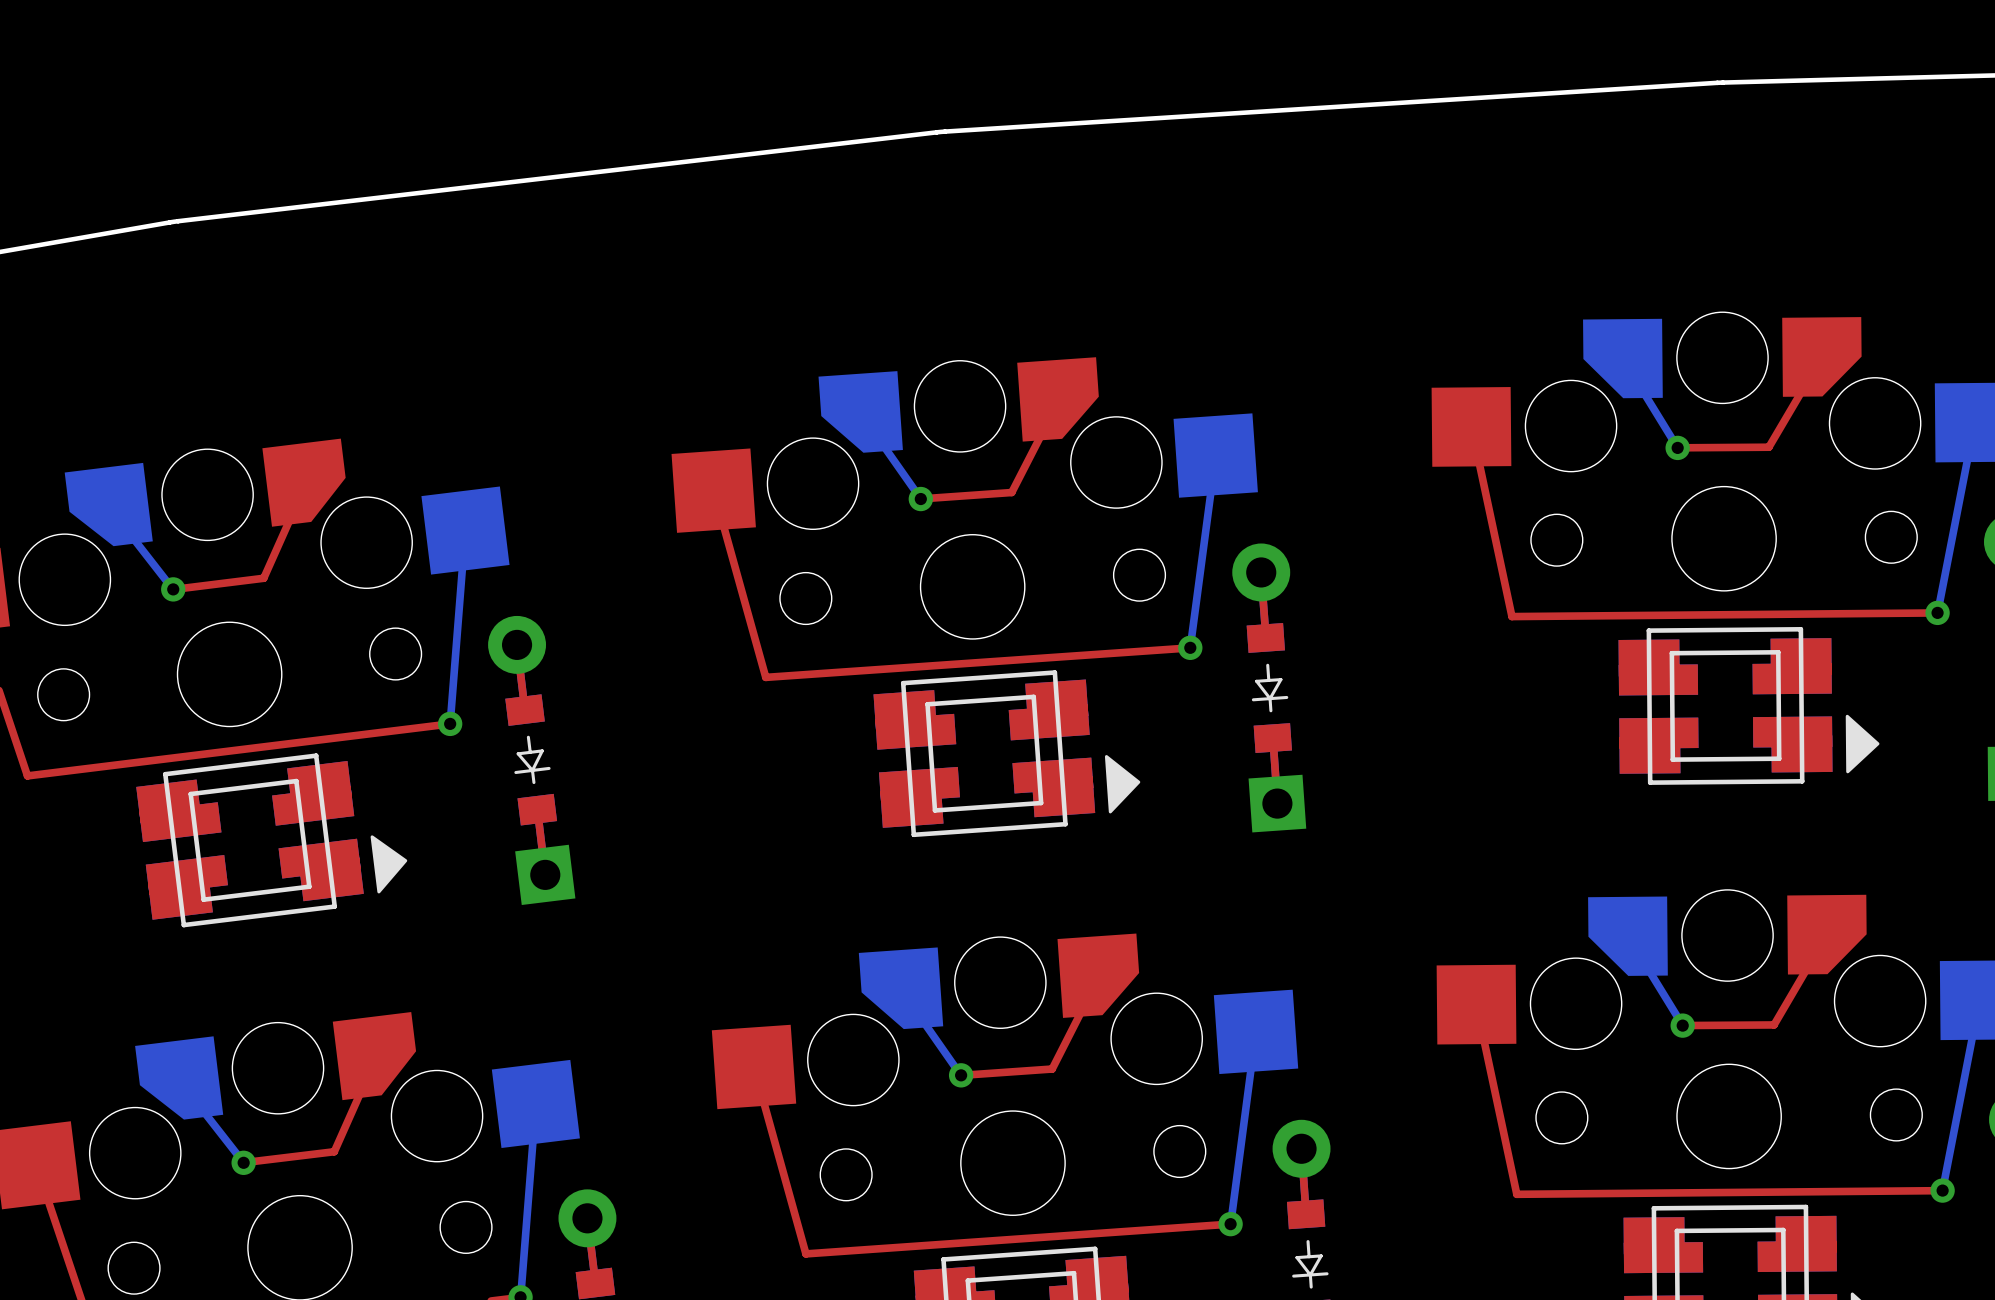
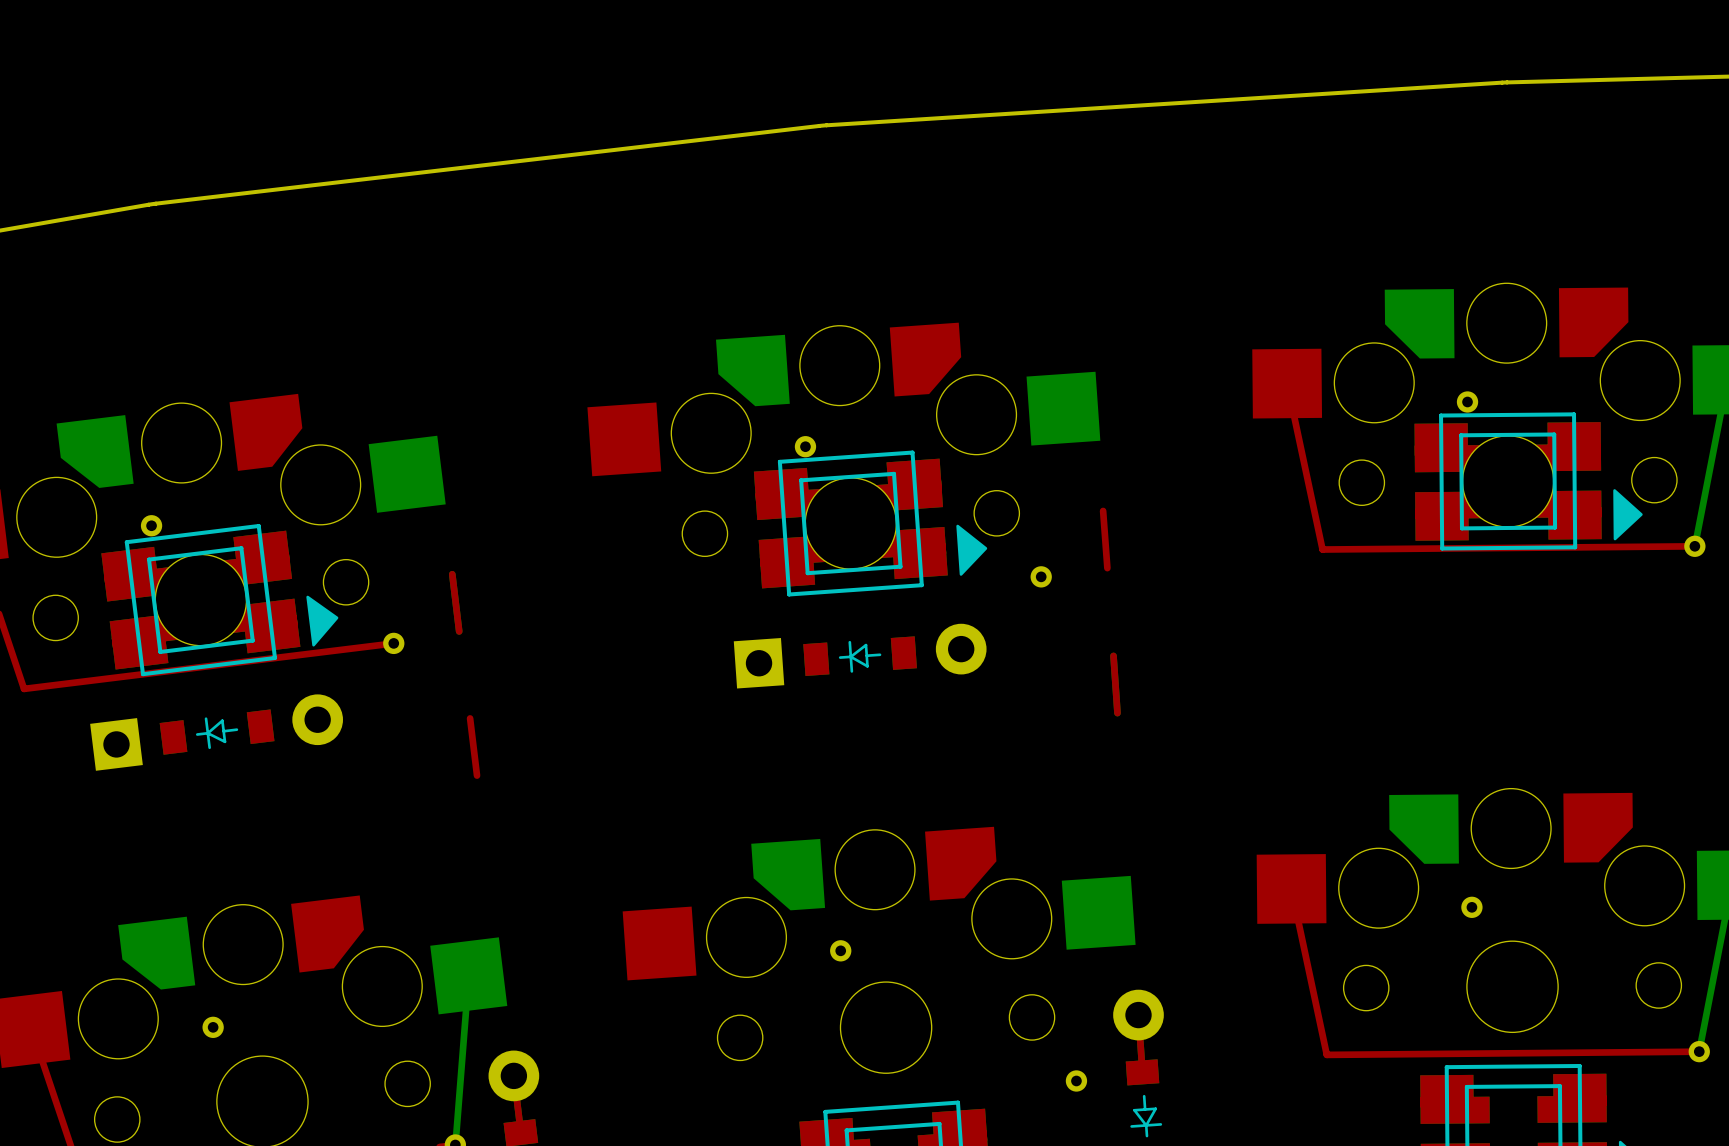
top track: (1822, 356) (1768, 447) (1677, 447) -> none
bottom track: (1622, 358) (1677, 447) -> none
top track: (1059, 399) (1011, 492) (920, 498) -> none
bottom track: (860, 413) (920, 498) -> none
bottom track: (1215, 455) (1190, 647) -> none
top track: (306, 482) (263, 578) (173, 589) -> none
top track: (713, 490) (765, 677) (1190, 647) -> none
bottom track: (108, 506) (173, 589) -> none
bottom track: (465, 530) (450, 723) -> none
part rotation: 0° (1269, 687) -> 90° clockwise (860, 656)
part position: (1269, 687) -> (860, 656)
part position: (1748, 705) -> (1528, 481)
part position: (1006, 753) -> (870, 523)
part rotation: 0° (531, 760) -> 90° clockwise (216, 732)
part position: (531, 760) -> (216, 732)
part position: (271, 840) -> (219, 600)
top track: (1826, 934) (1774, 1024) (1682, 1025) -> none
bottom track: (1628, 936) (1682, 1025) -> none
top track: (1099, 975) (1052, 1069) (960, 1075) -> none
bottom track: (901, 989) (960, 1075) -> none
bottom track: (1255, 1031) (1230, 1224) -> none
top track: (376, 1055) (334, 1151) (243, 1162) -> none
top track: (753, 1066) (805, 1253) (1230, 1224) -> none
bottom track: (179, 1080) (243, 1162) -> none

